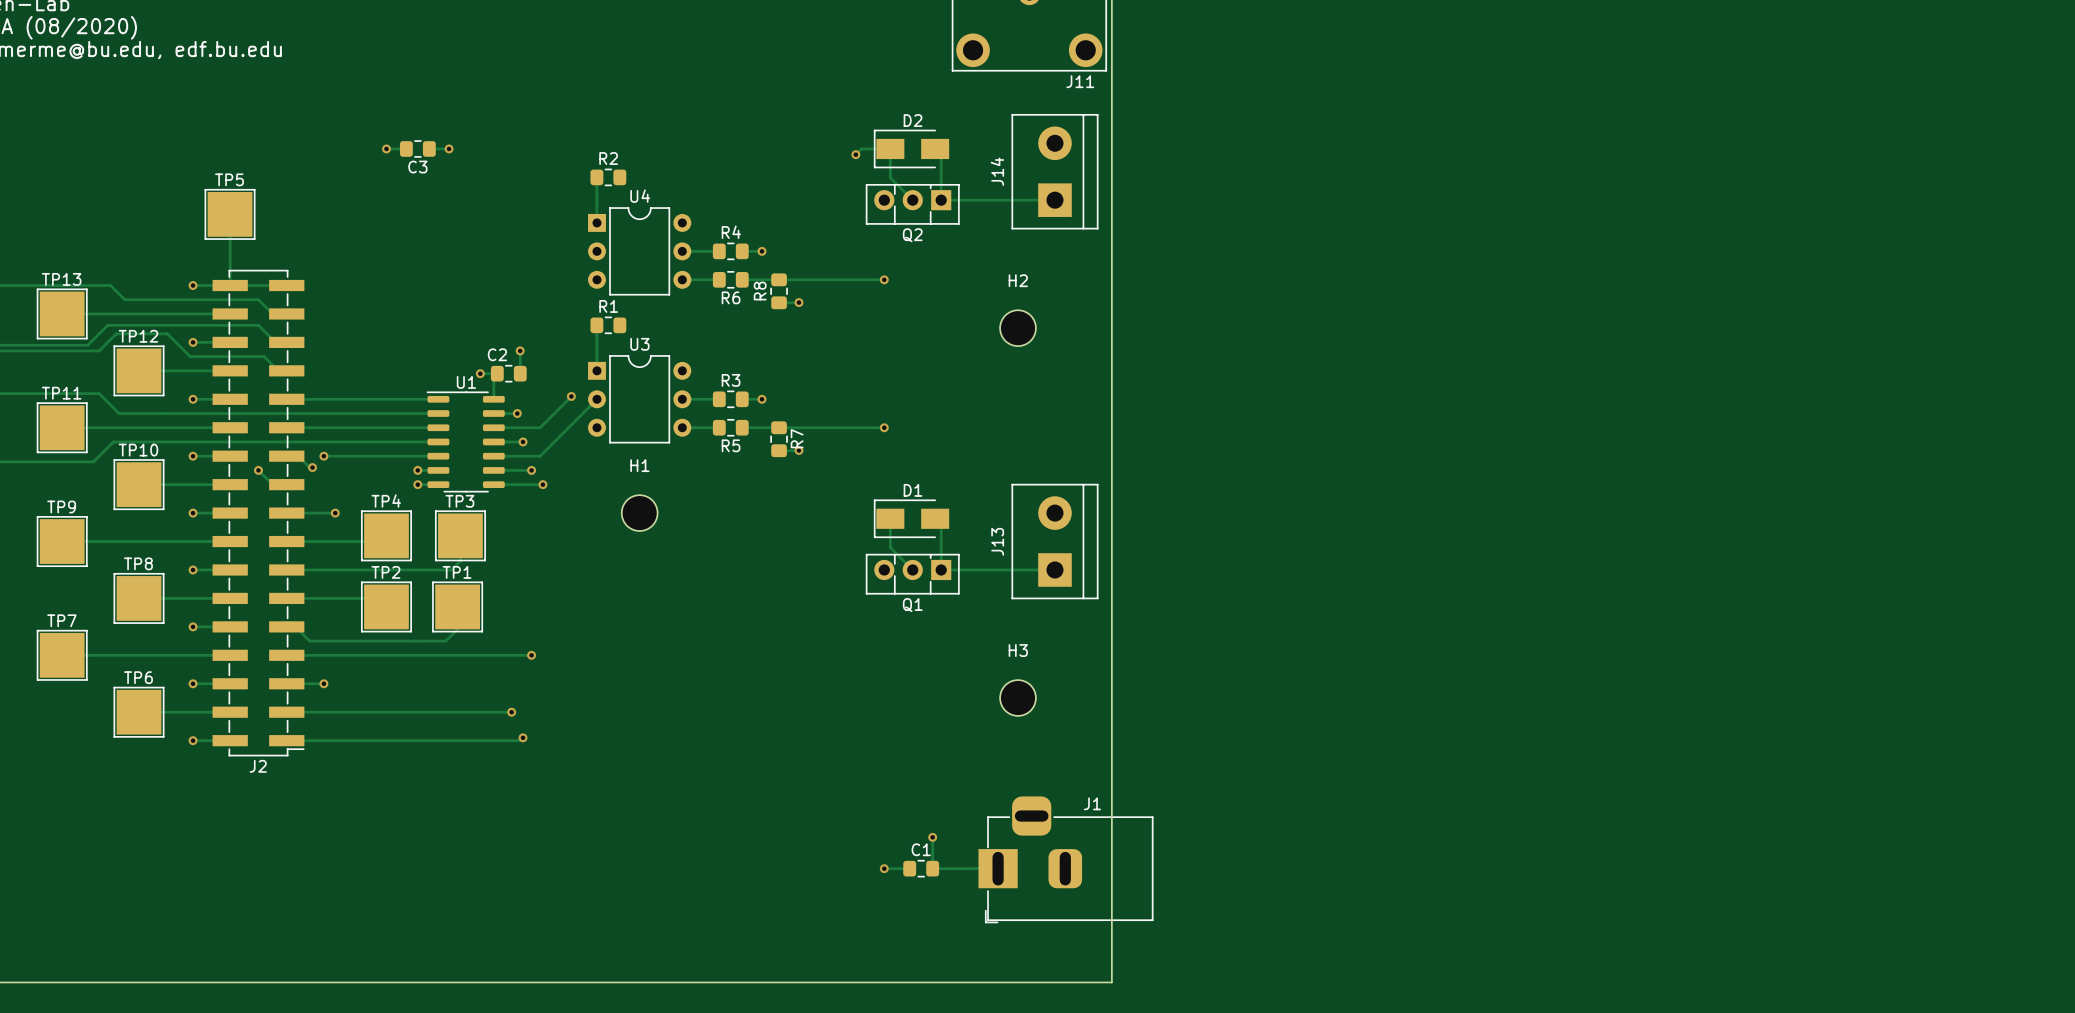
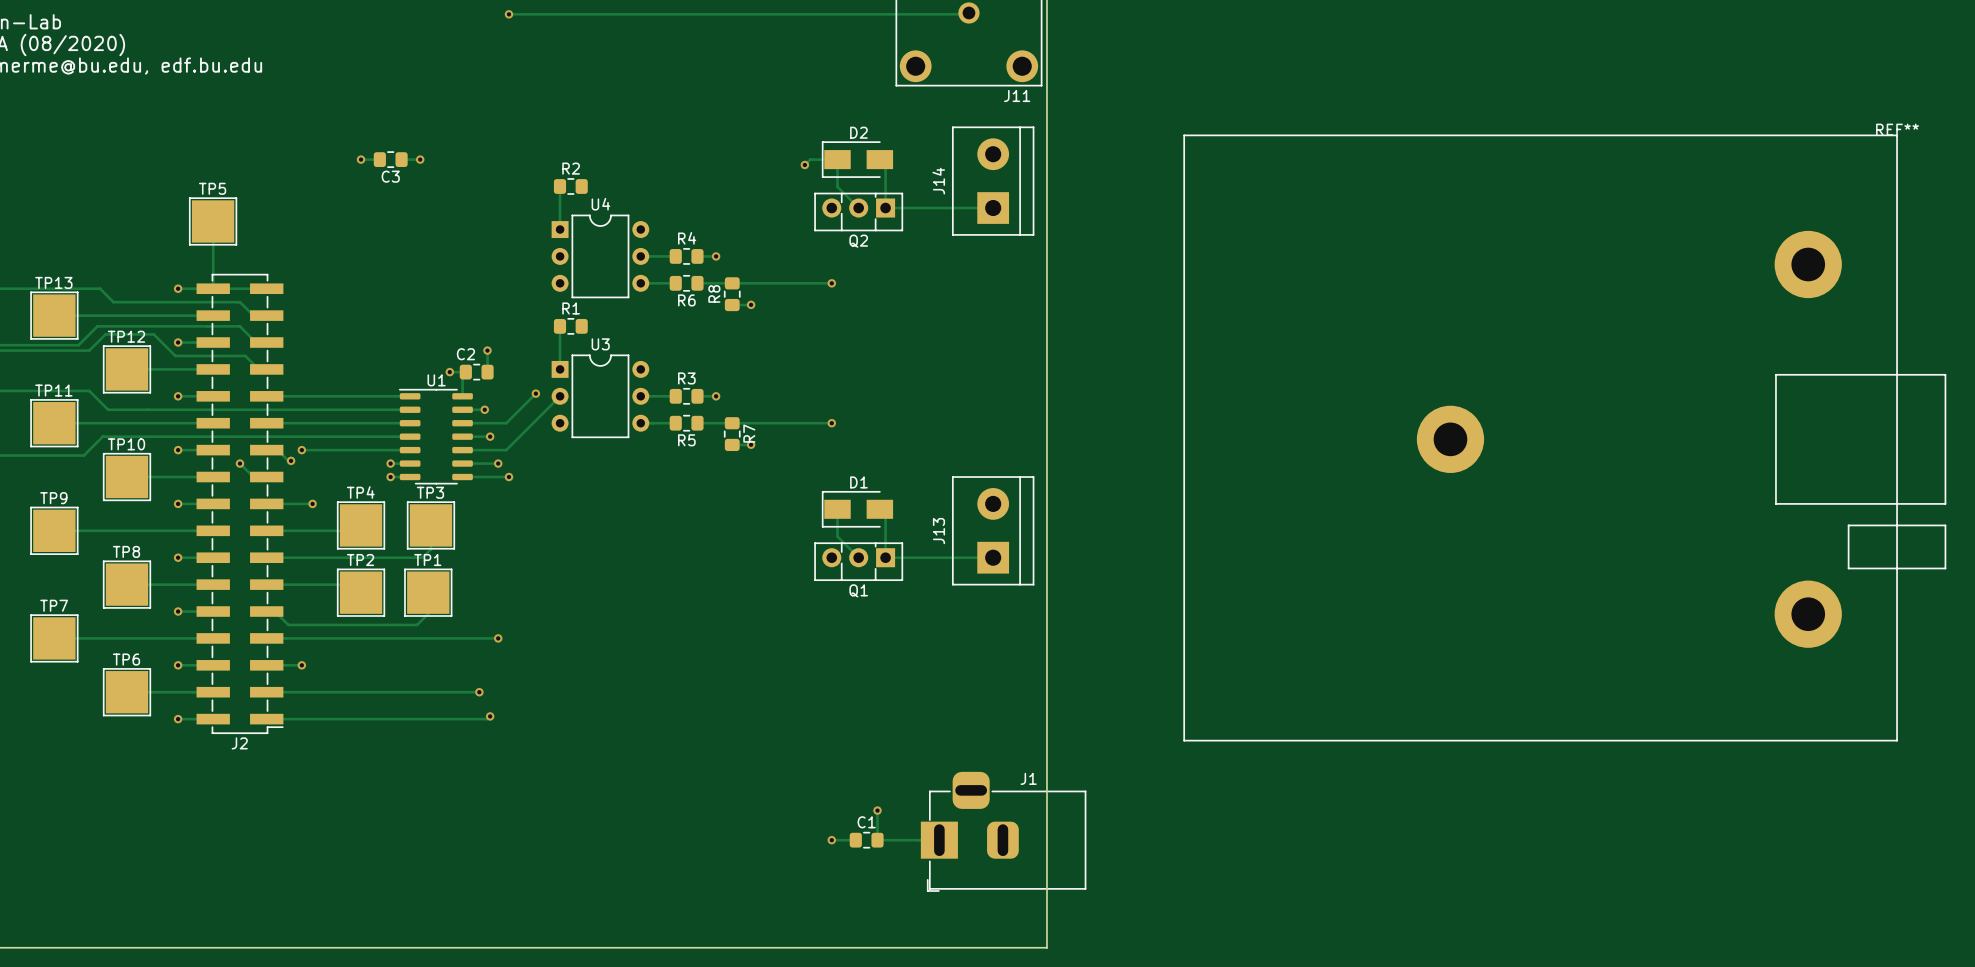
H2: (1018, 328) -> none
REF**: none -> (1564, 438)
H1: (639, 513) -> none
H3: (1018, 697) -> none

